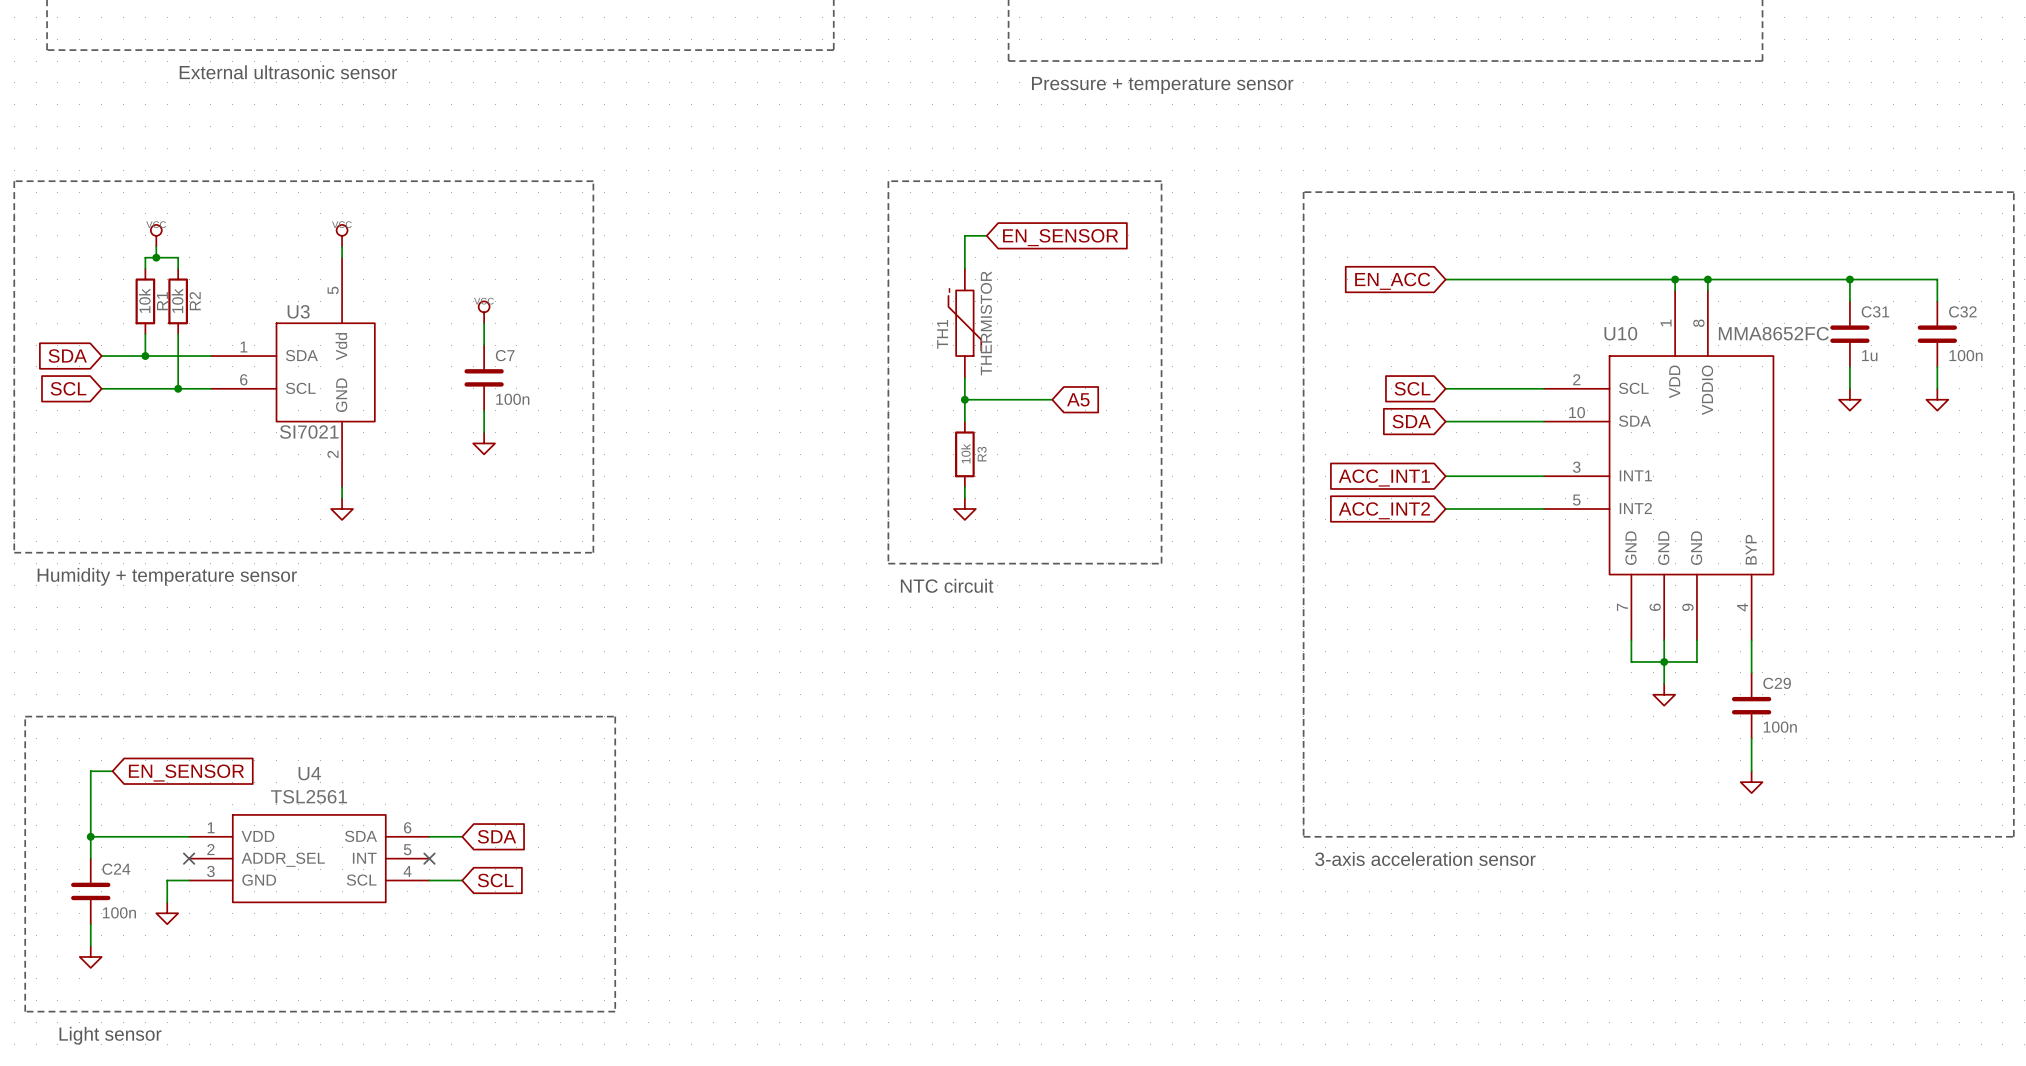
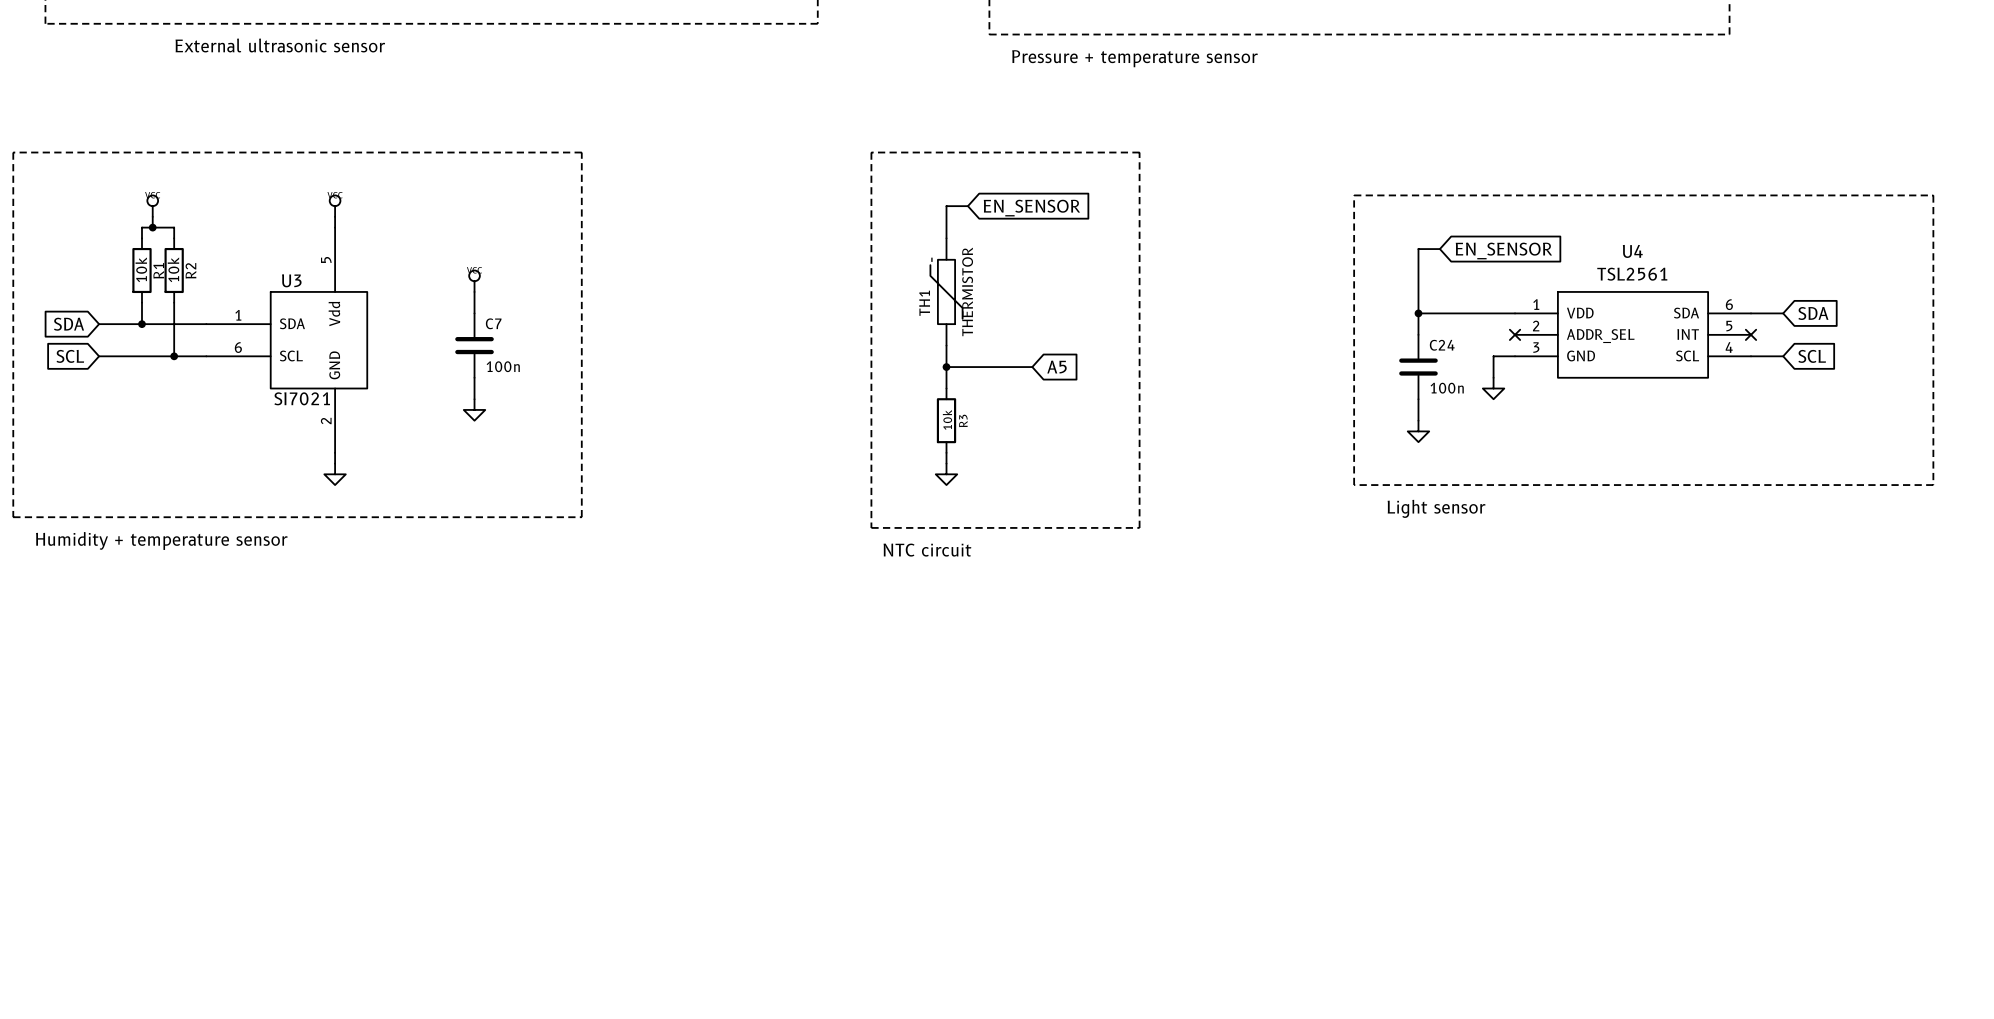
line: (1303, 192) (1303, 836) (2013, 836) (2013, 192) (1303, 192) -> none
line: none -> (1354, 195) (1933, 195) (1933, 485) (1354, 485) (1354, 195)
wire: none -> (1418, 249) (1418, 334)
wire: (1467, 279) (1937, 279) (1937, 301) -> none
wire: (1675, 279) (1675, 290) -> none
junction: (1675, 279) -> none
wire: (1707, 279) (1707, 290) -> none
junction: (1707, 279) -> none
wire: (1849, 279) (1849, 301) -> none
junction: (1849, 279) -> none
global label: EN_ACC (1392, 281) -> none
global label: none -> EN_SENSOR (1503, 250)
C31: 1u (1849, 334) -> none
C32: 100n (1937, 334) -> none
junction: none -> (1418, 313)
wire: none -> (1751, 313) (1783, 313)
global label: none -> SDA (1813, 313)
no-connect mark: none -> (1515, 334)
no-connect mark: none -> (1751, 334)
wire: (1849, 366) (1849, 388) -> none
wire: (1937, 366) (1937, 388) -> none
global label: SCL (1412, 388) -> none
wire: (1445, 388) (1522, 388) -> (1493, 377) (1493, 356)
wire: none -> (1751, 356) (1783, 356)
global label: none -> SCL (1812, 356)
power symbol: (1849, 399) -> none
power symbol: (1937, 399) -> none
global label: SDA (1411, 421) -> none
wire: (1445, 421) (1543, 421) -> (1418, 313) (1515, 313)
power symbol: none -> (1493, 388)
wire: none -> (1418, 399) (1418, 420)
power symbol: none -> (1418, 431)
U10: MMA8652FC (1658, 465) -> none
wire: (1445, 476) (1543, 476) -> none
global label: ACC_INT1 (1384, 478) -> none
wire: (1445, 509) (1543, 509) -> none
global label: ACC_INT2 (1384, 510) -> none
text: none -> Light sensor (1436, 508)
wire: (1631, 640) (1631, 661) (1696, 661) (1696, 640) -> none
wire: (1664, 640) (1664, 683) -> none
wire: (1751, 640) (1751, 672) -> none
junction: (1664, 661) -> none
power symbol: (1664, 694) -> none
C29: 100n (1751, 705) -> none
line: (25, 716) (615, 716) (615, 1011) (25, 1011) (25, 716) -> none
wire: (1751, 738) (1751, 771) -> none
wire: (112, 771) (90, 771) (90, 858) -> none
global label: EN_SENSOR (186, 773) -> none
power symbol: (1751, 782) -> none
wire: (90, 836) (189, 836) -> none
junction: (90, 836) -> none
wire: (429, 836) (462, 836) -> none
global label: SDA (497, 836) -> none
no-connect mark: (189, 858) -> none
U4 position: (309, 858) -> (1633, 334)
no-connect mark: (429, 858) -> none
text: 3-axis acceleration sensor (1425, 859) -> none
wire: (189, 880) (167, 880) (167, 902) -> none
wire: (429, 880) (462, 880) -> none
global label: SCL (495, 880) -> none
C24 position: (90, 891) -> (1418, 367)
power symbol: (167, 913) -> none
wire: (90, 924) (90, 946) -> none
power symbol: (90, 956) -> none
text: Light sensor (110, 1035) -> none

